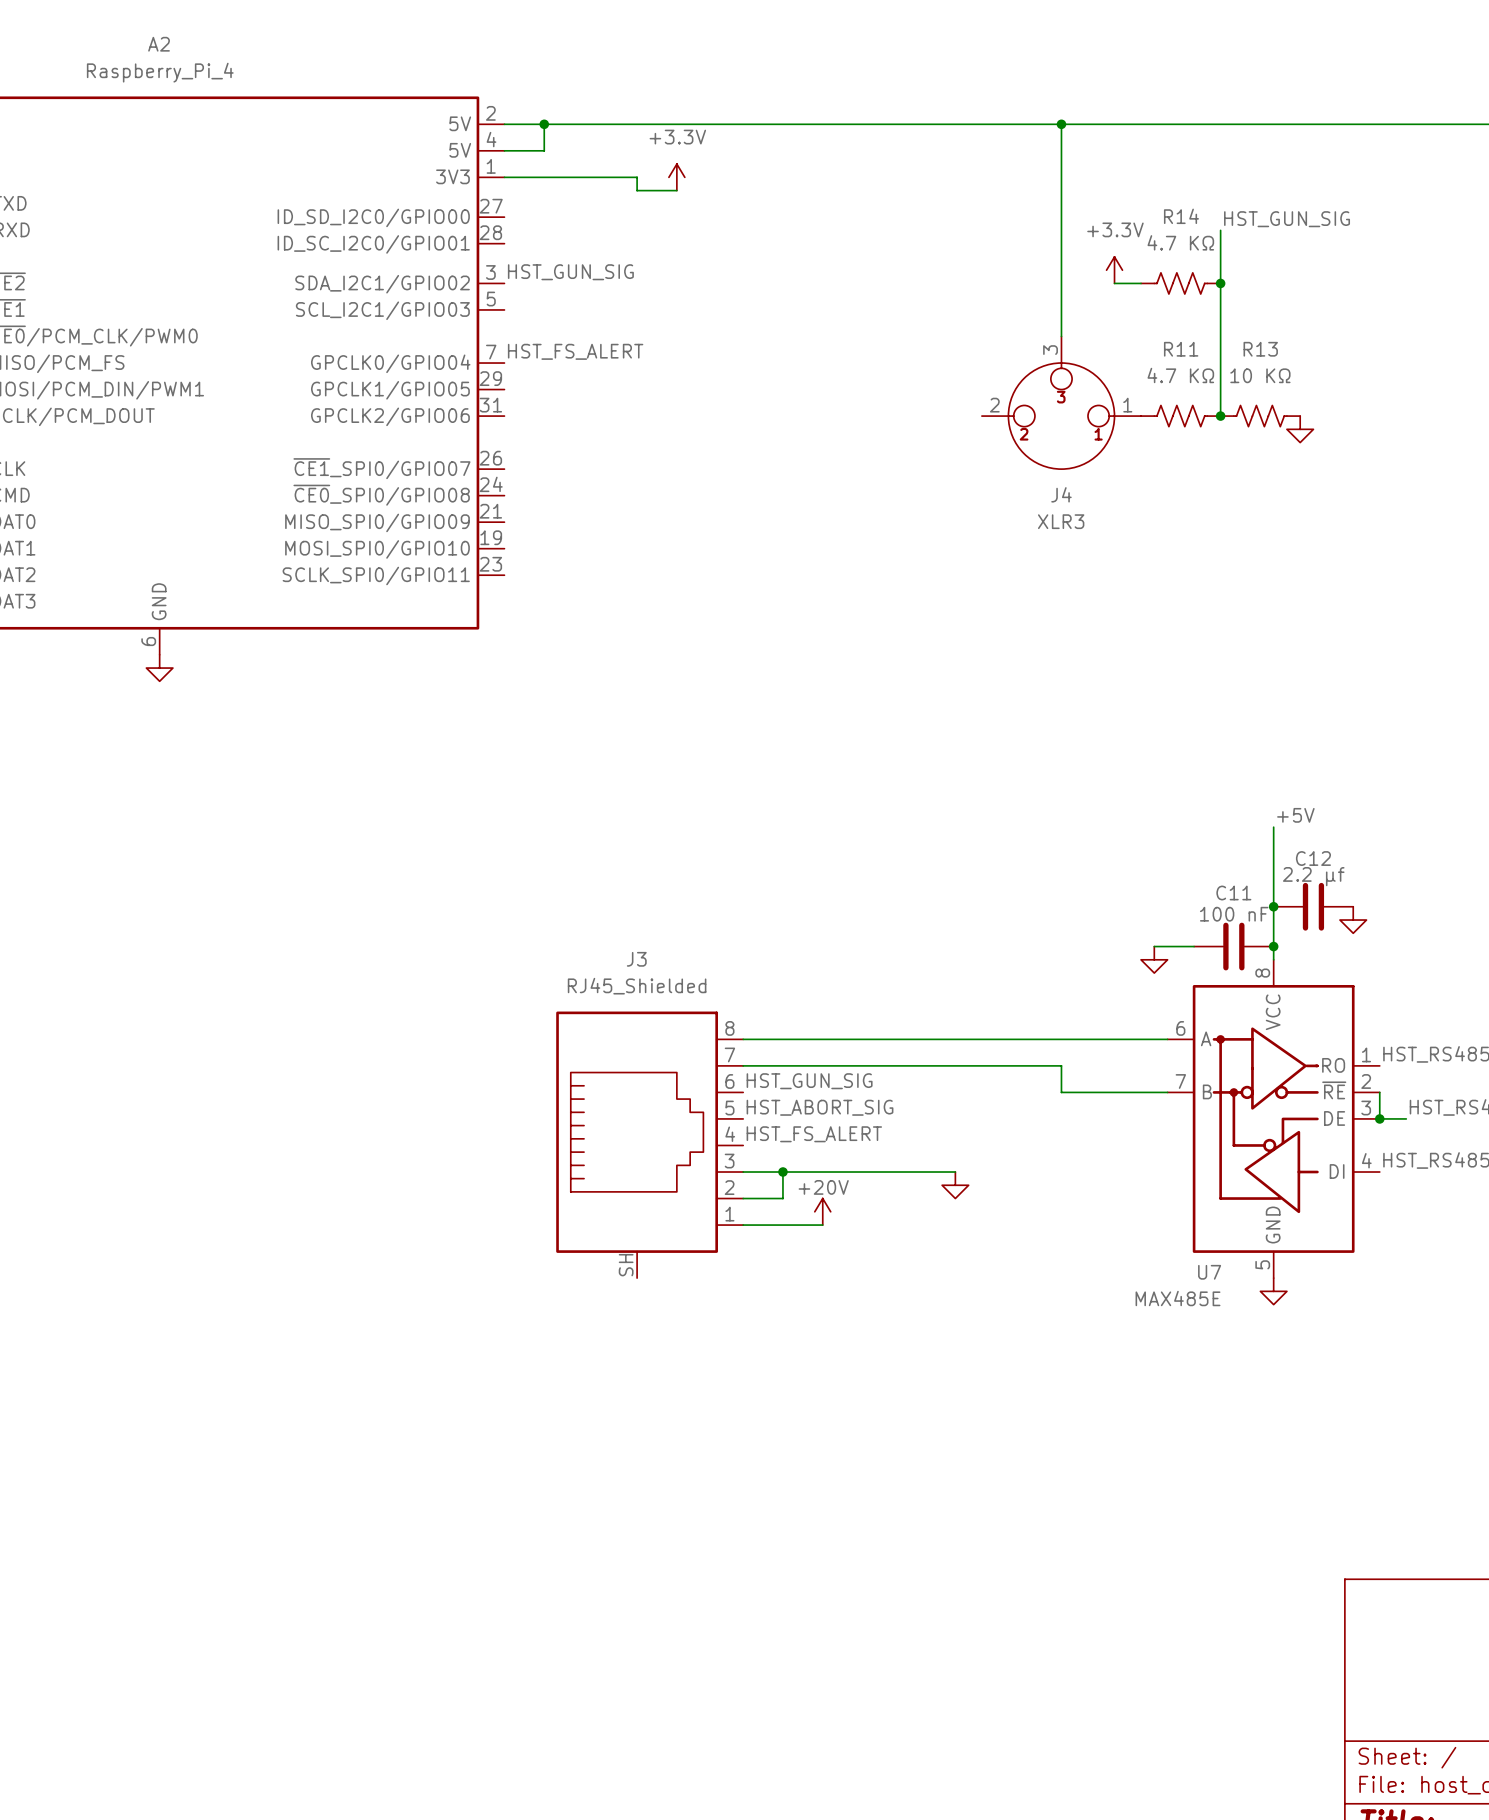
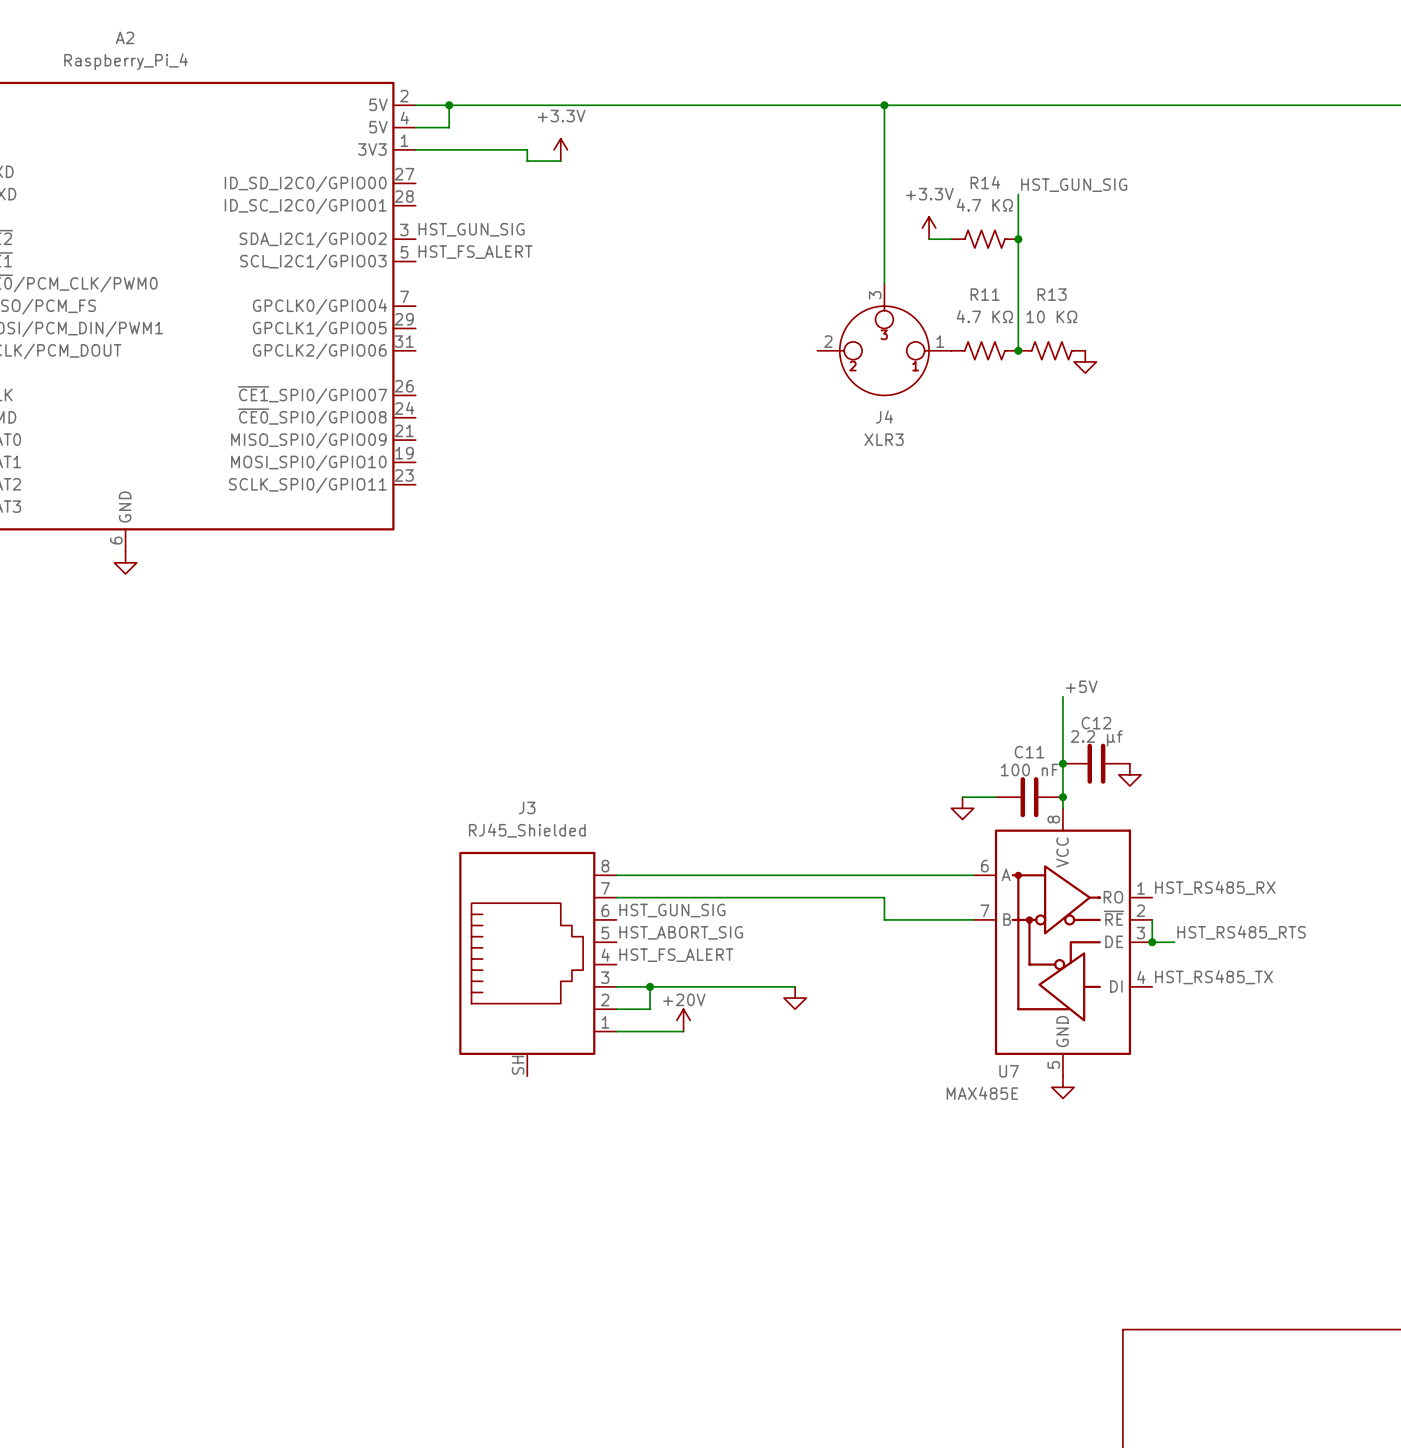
label position: HST_FS_ALERT (575, 351) -> HST_FS_ALERT (475, 252)

